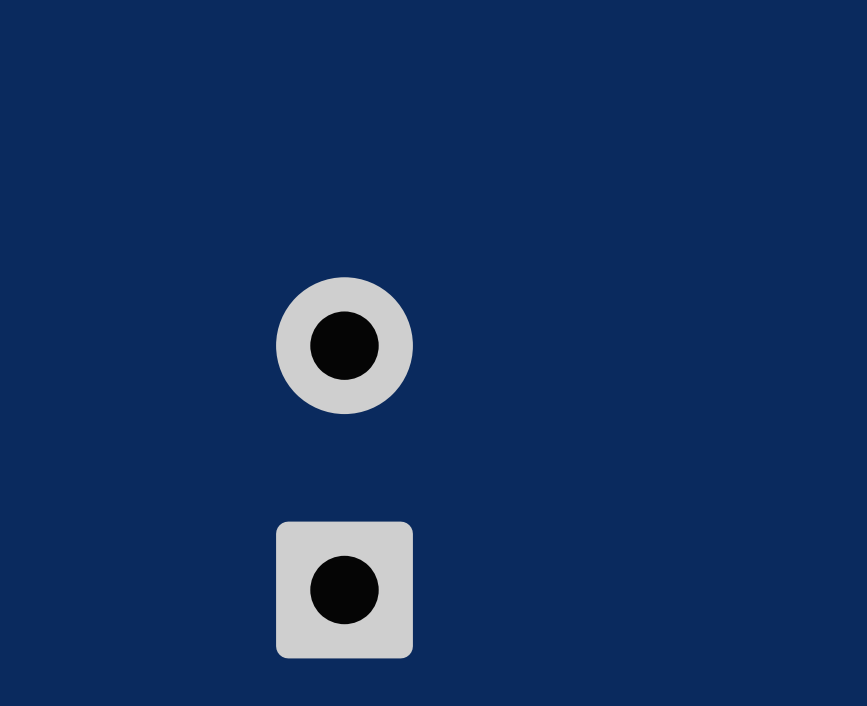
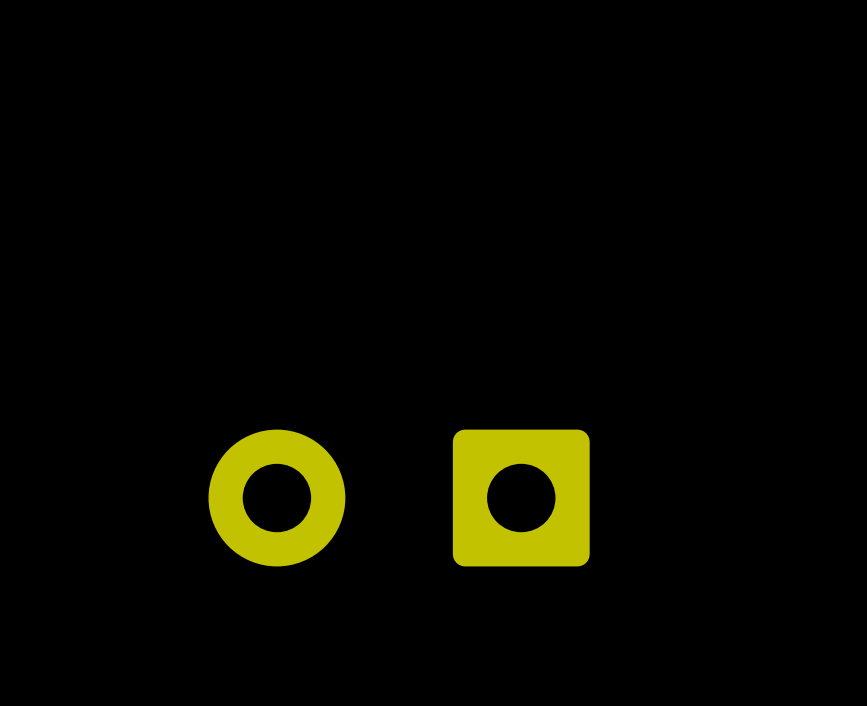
part rotation: 0° (344, 467) -> 90° counterclockwise (399, 498)

